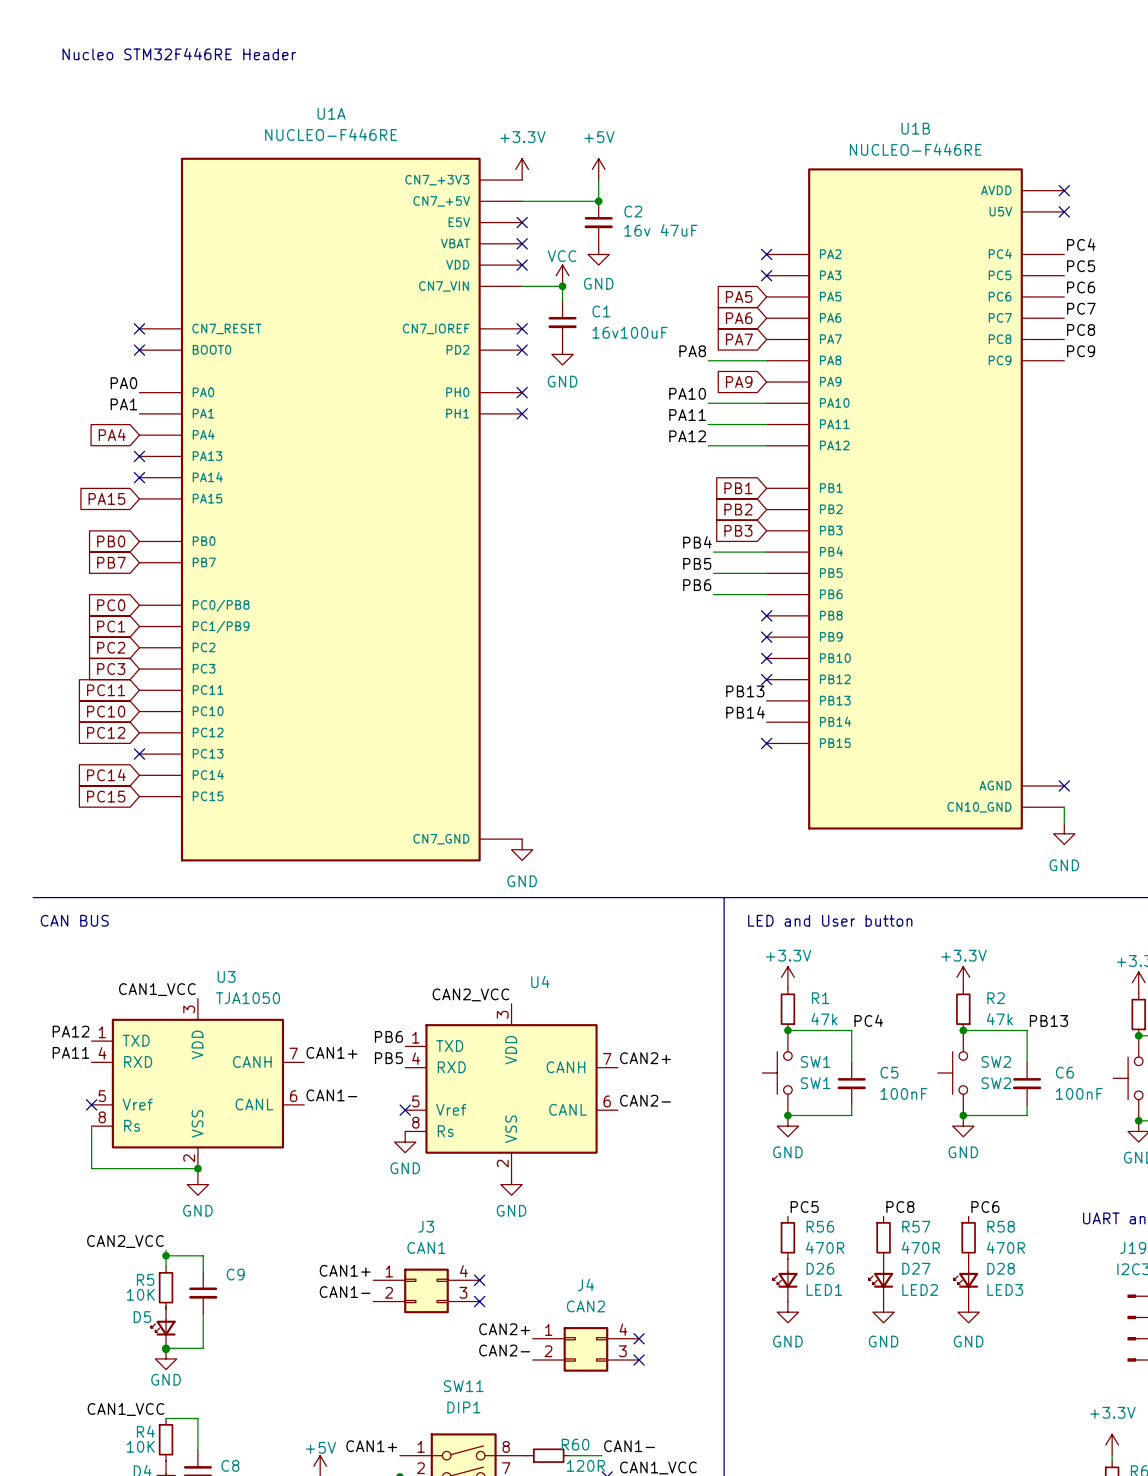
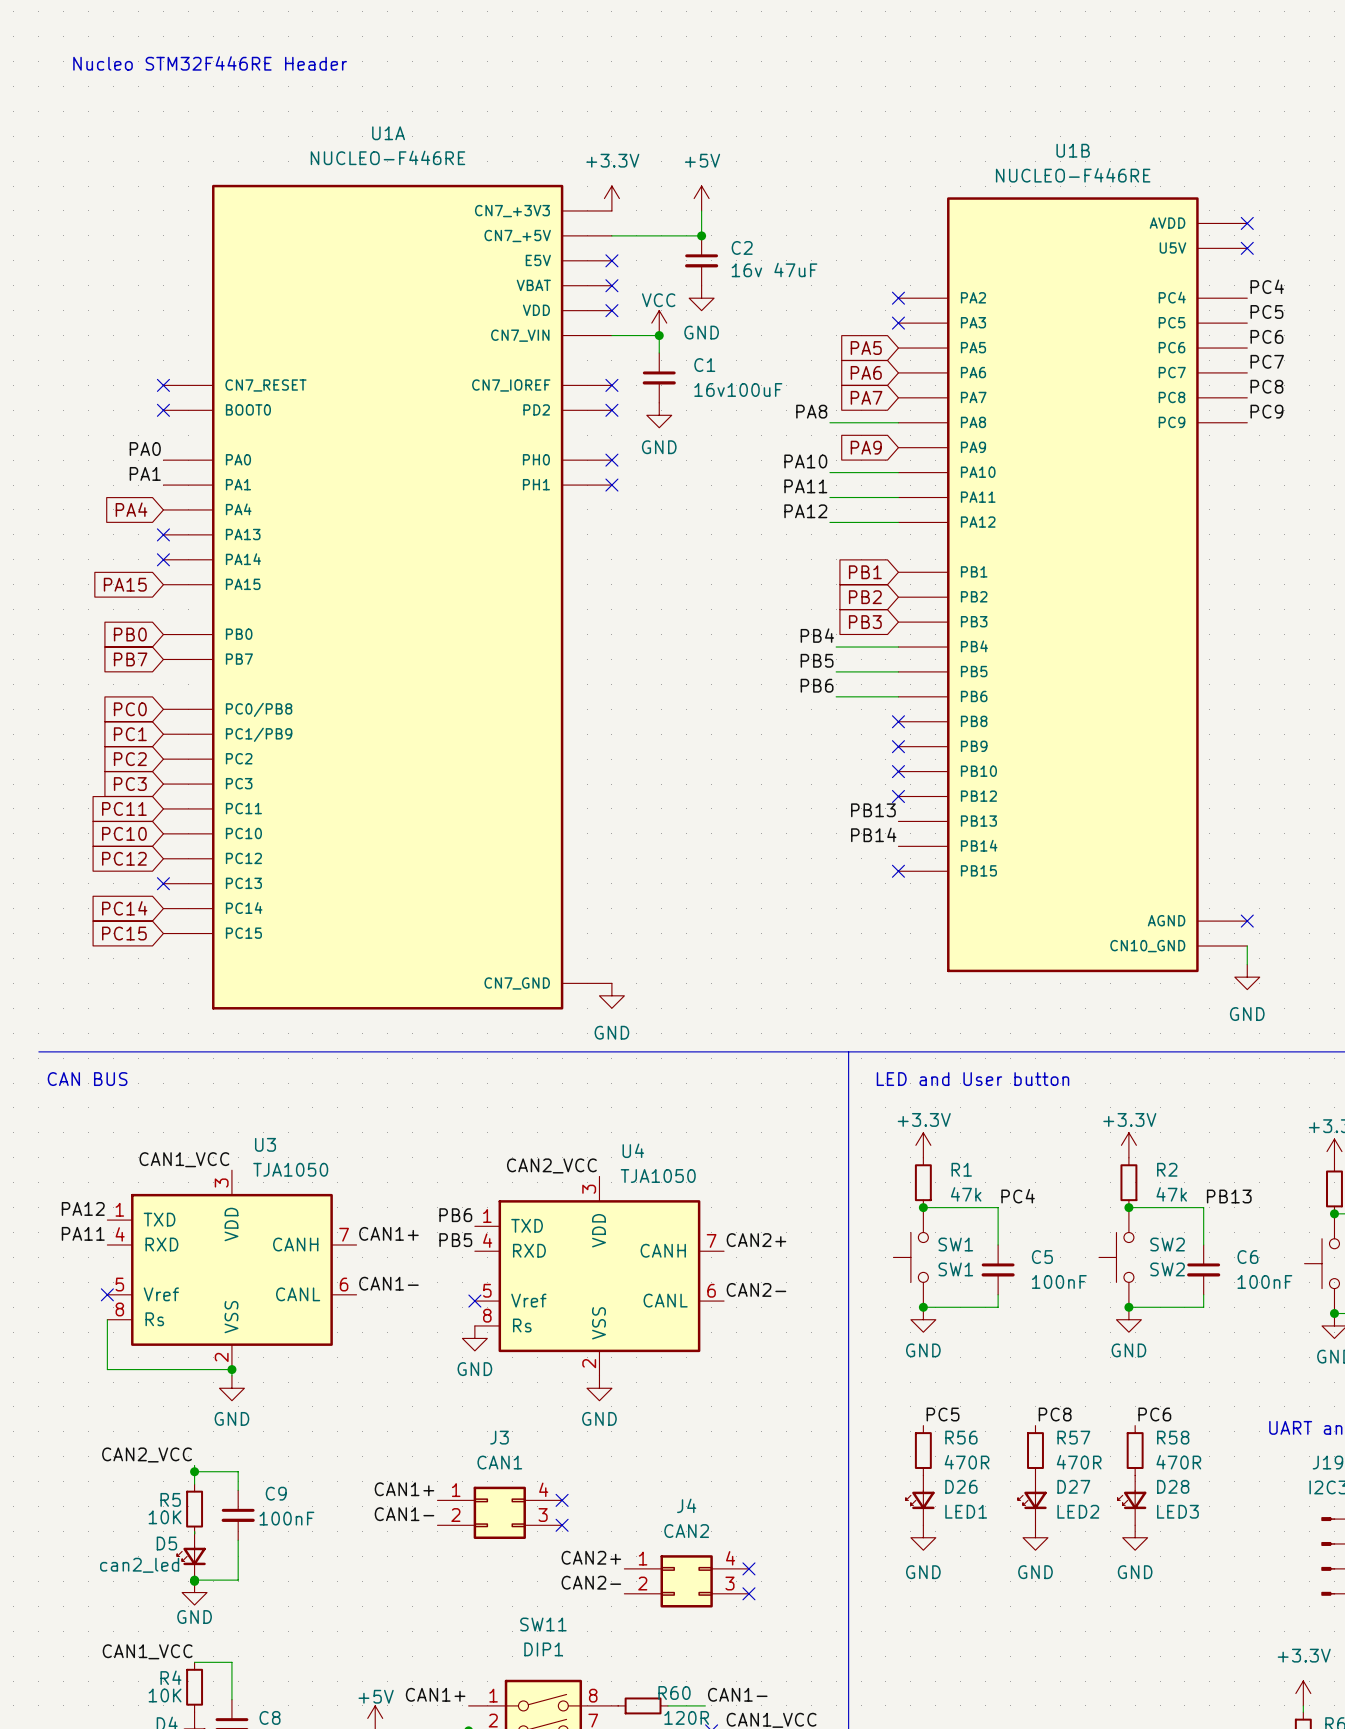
U4 value: none -> TJA1050 (658, 1176)
C9 value: none -> 100nF (286, 1518)
D5 value: none -> can2_led (139, 1565)

